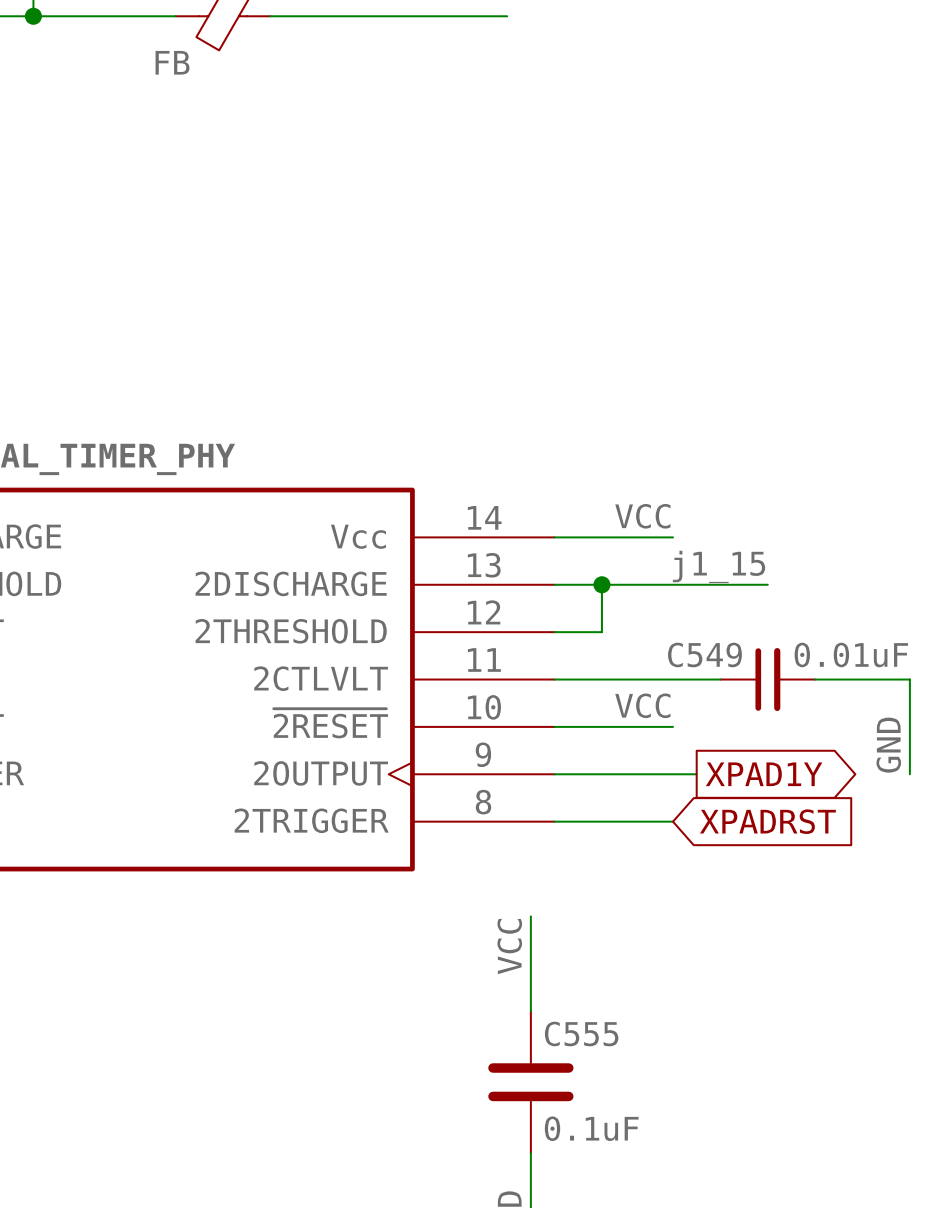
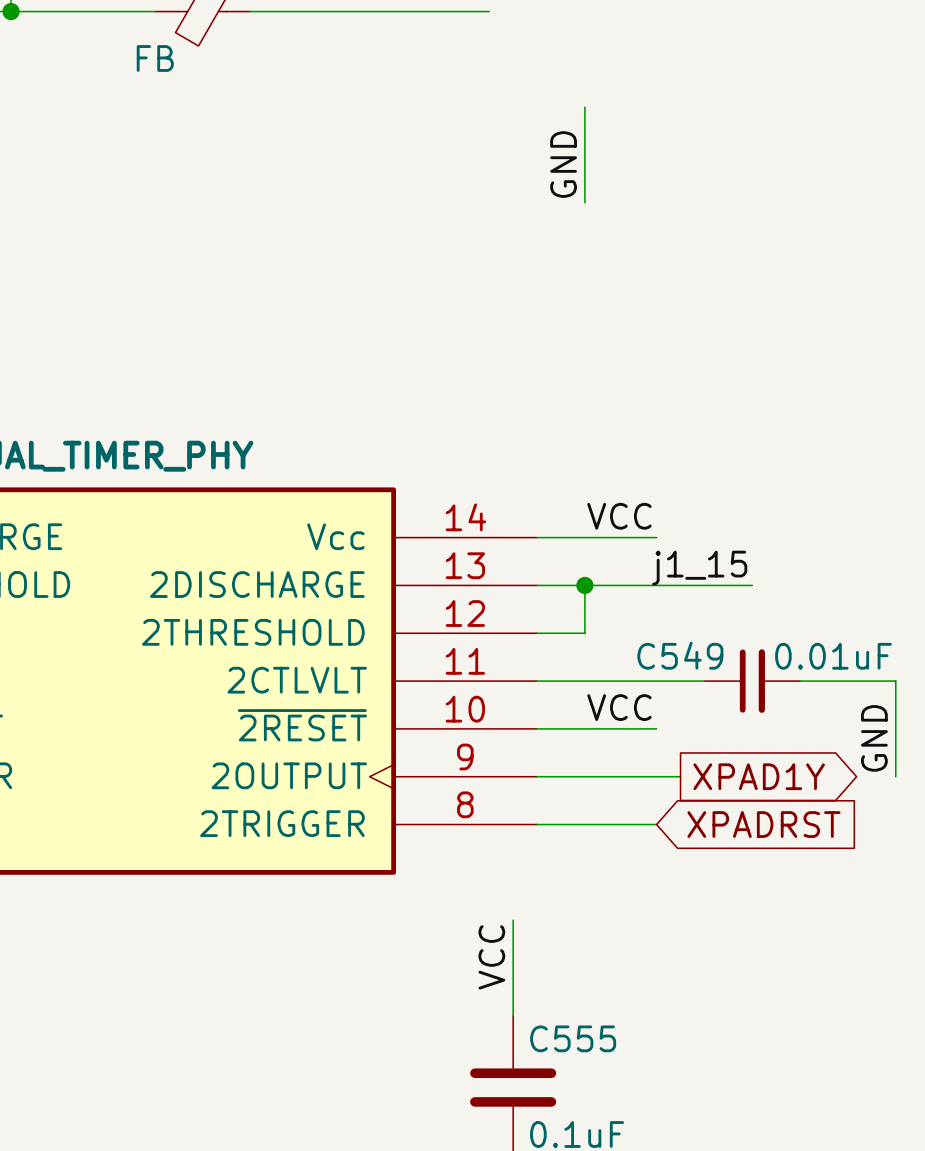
wire: none -> (584, 107) (584, 202)
label: none -> GND (563, 164)

